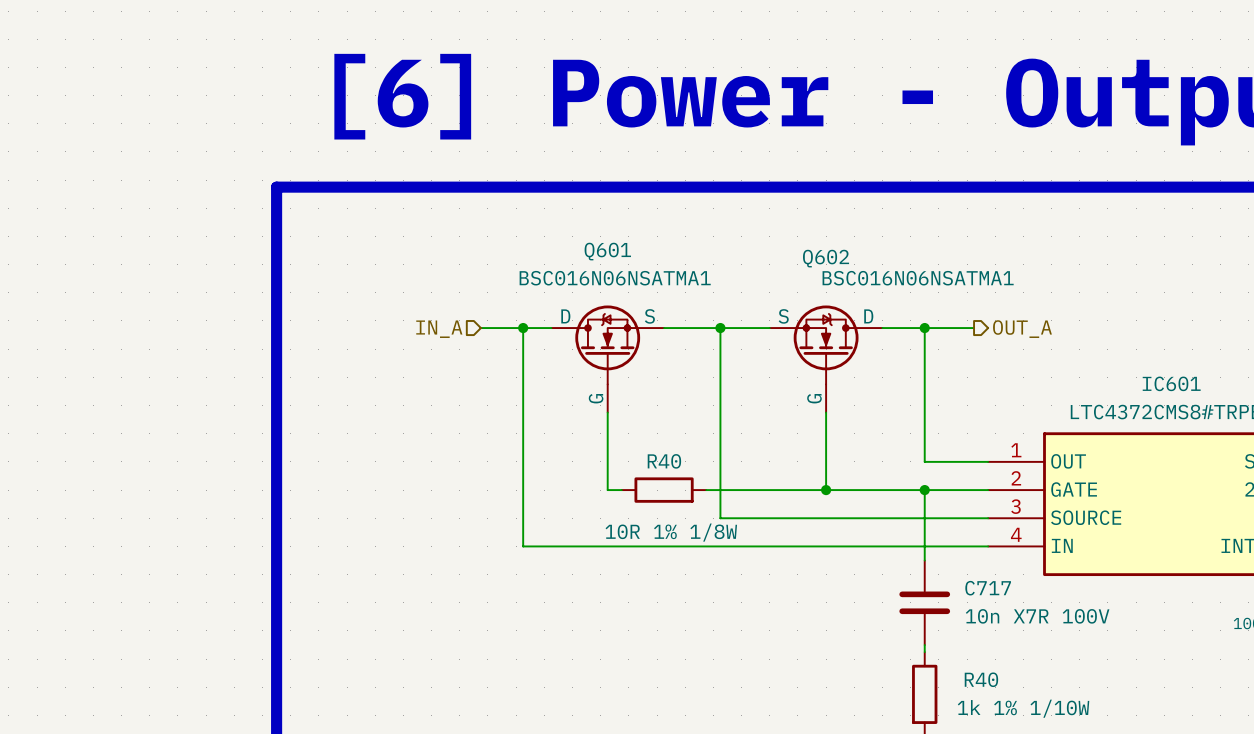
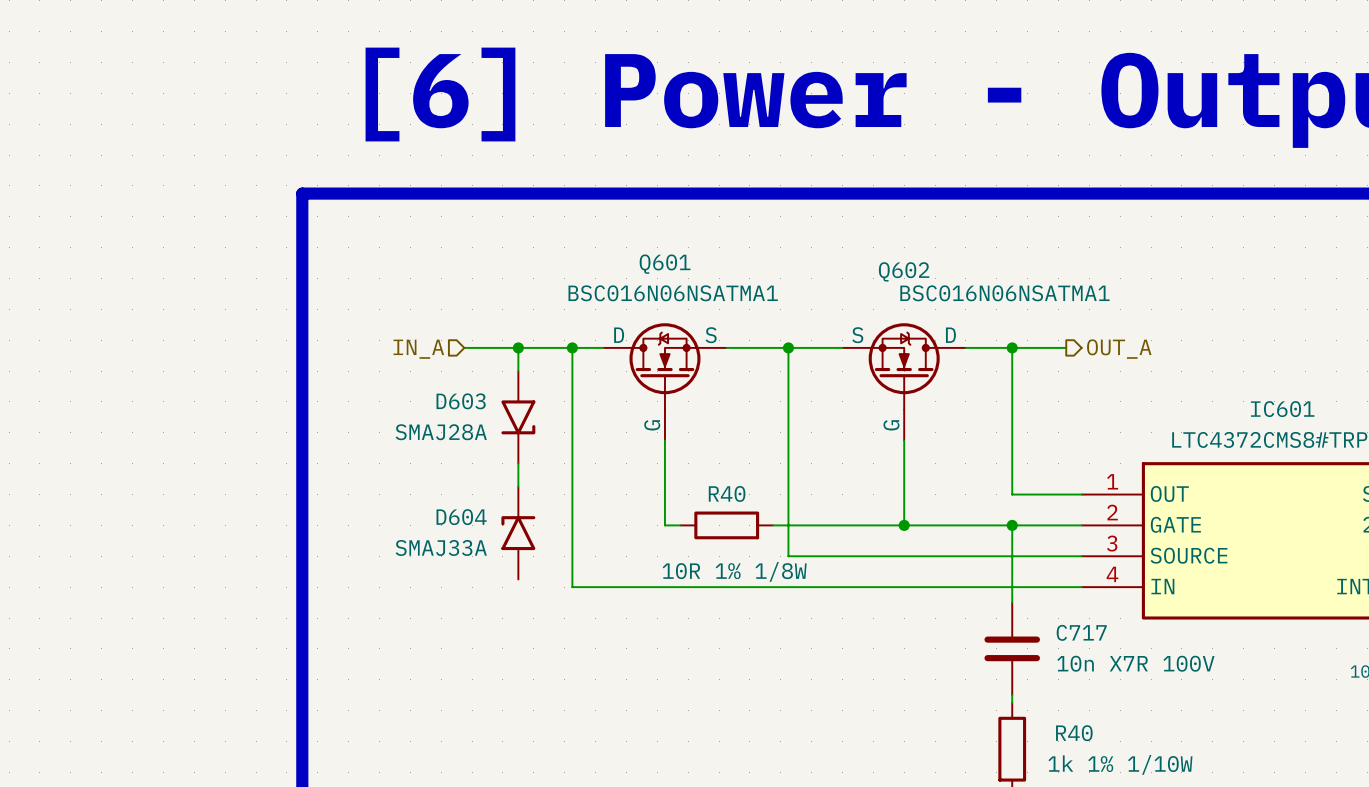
wire: none -> (464, 347) (526, 347)
wire: none -> (518, 347) (518, 371)
junction: none -> (518, 347)
hierarchical label position: IN_A (439, 329) -> IN_A (418, 349)
D603: none -> SMAJ28A (518, 417)
wire: none -> (518, 463) (518, 486)
D604: none -> SMAJ33A (518, 533)

